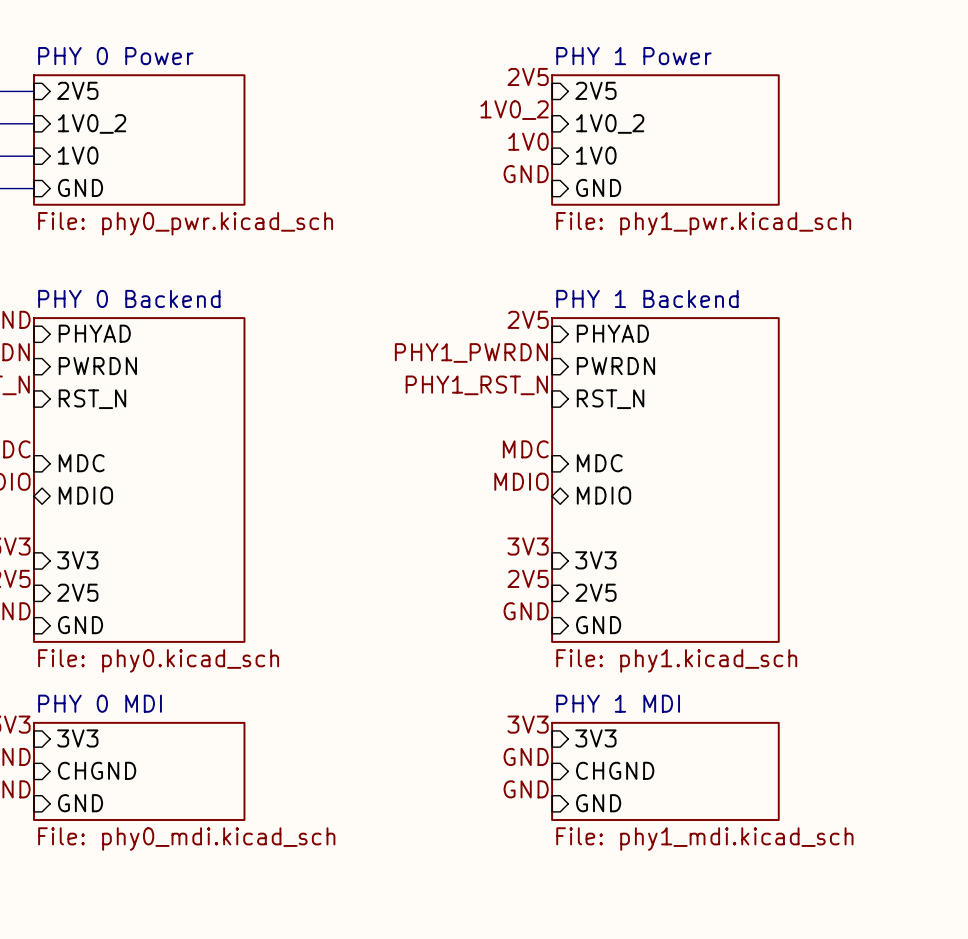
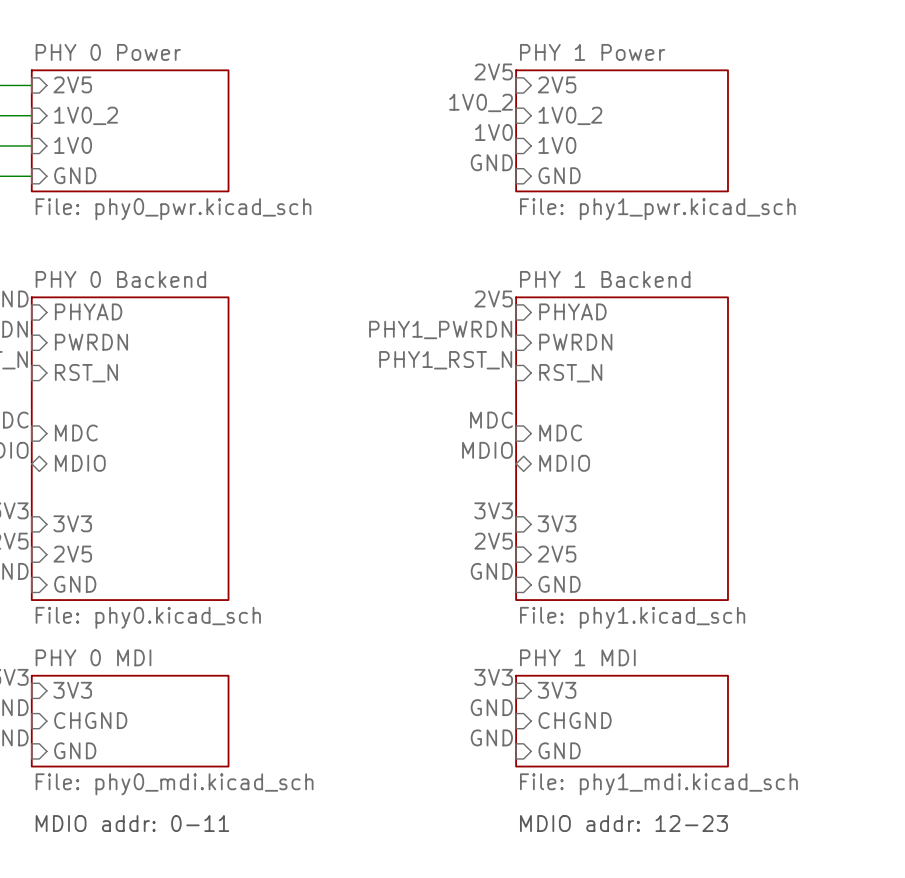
text: none -> MDIO addr: 0-11 (132, 823)
text: none -> MDIO addr: 12-23 (623, 823)

